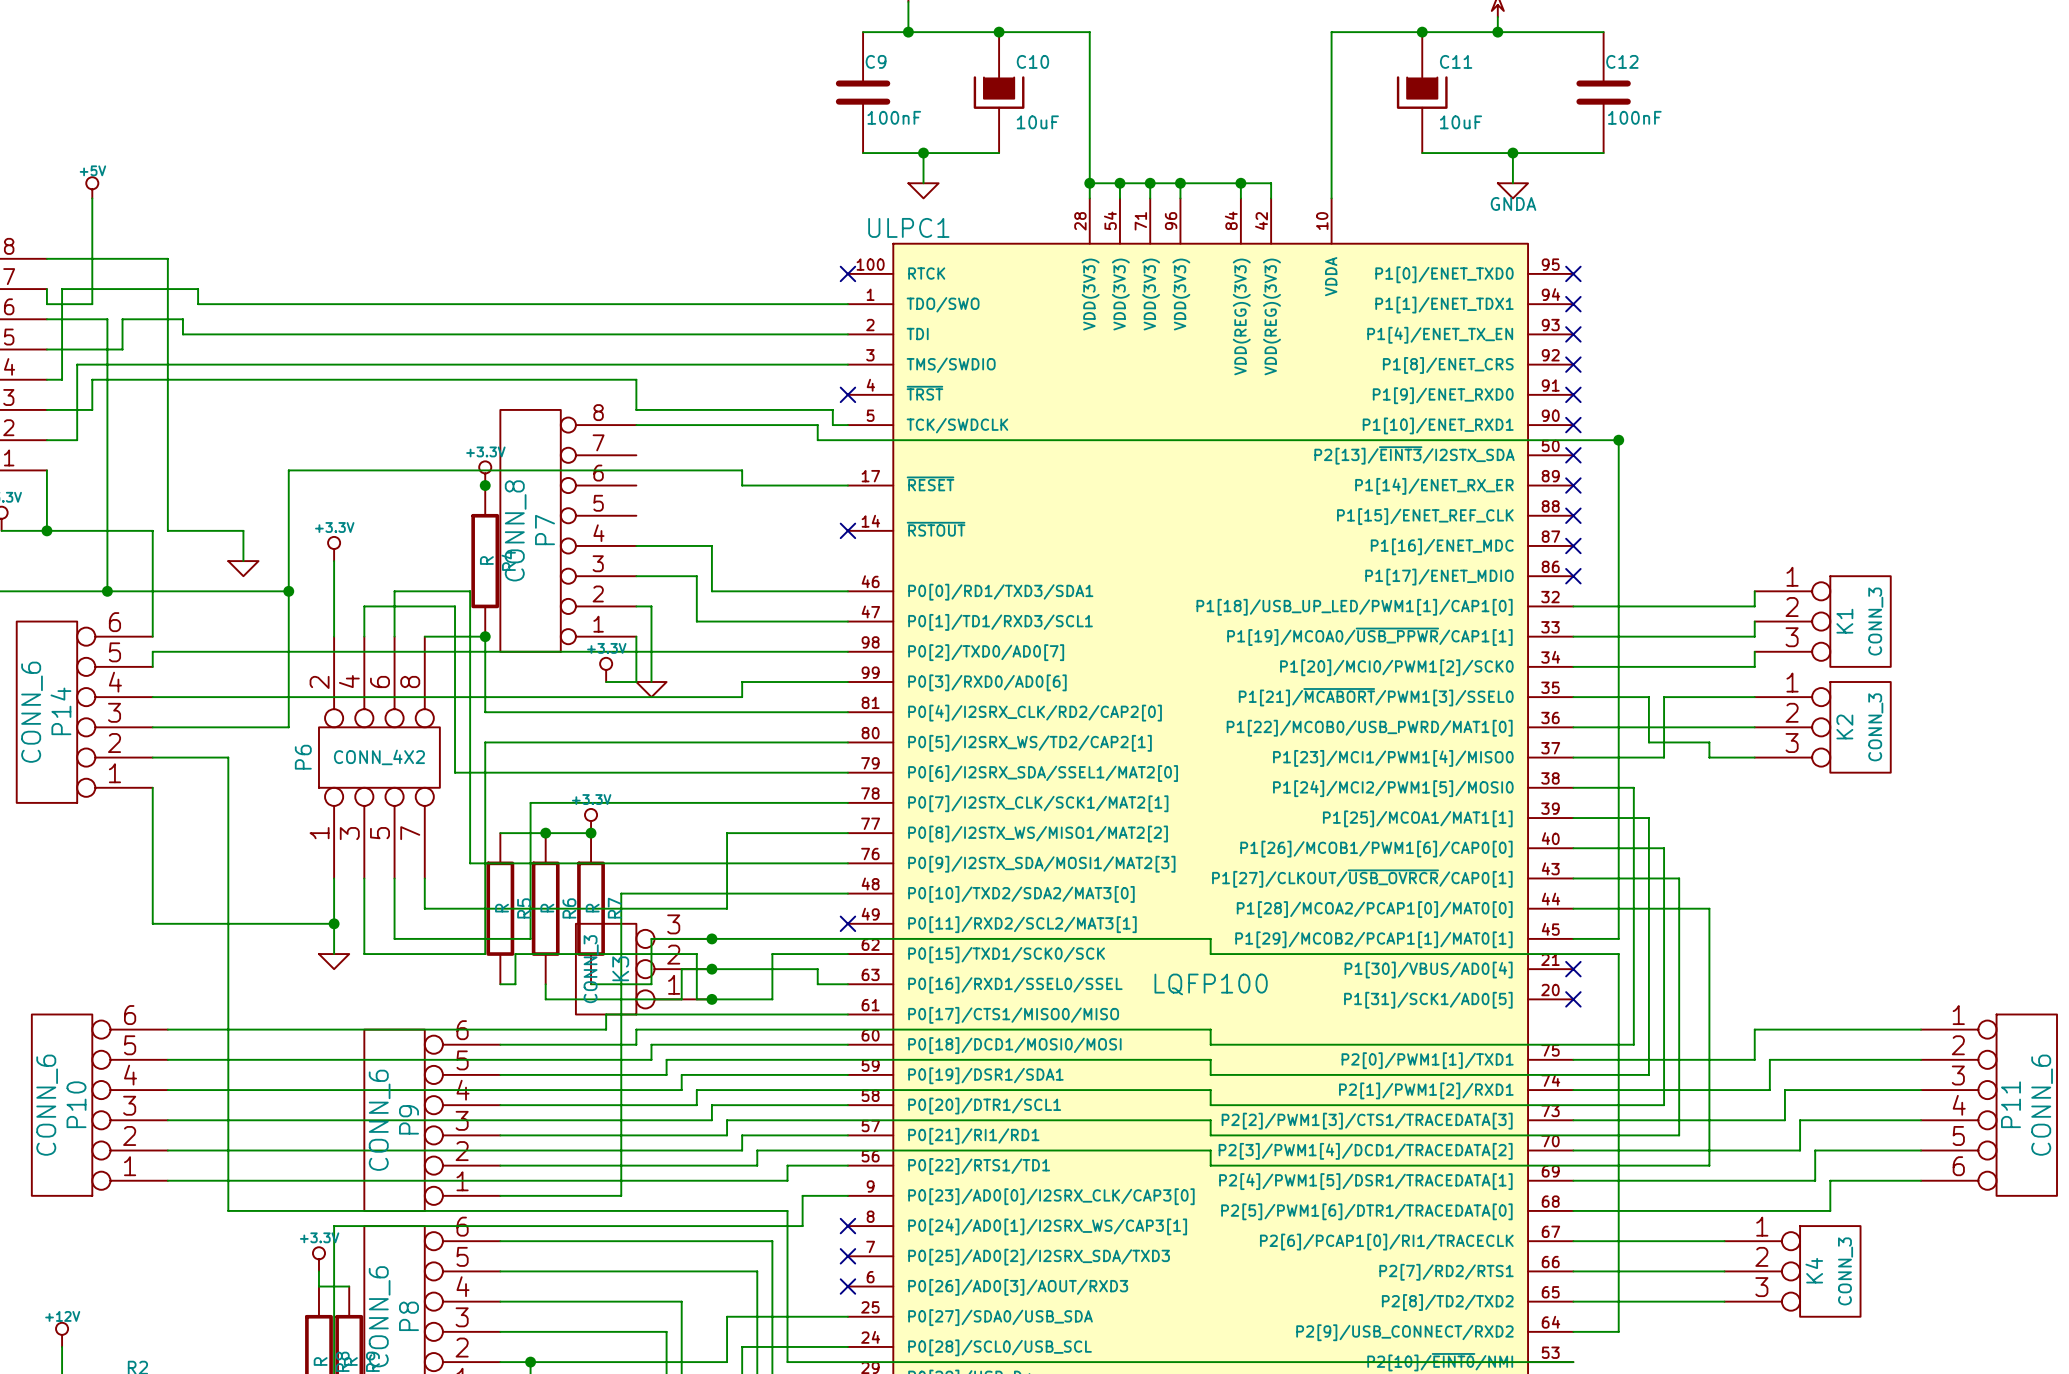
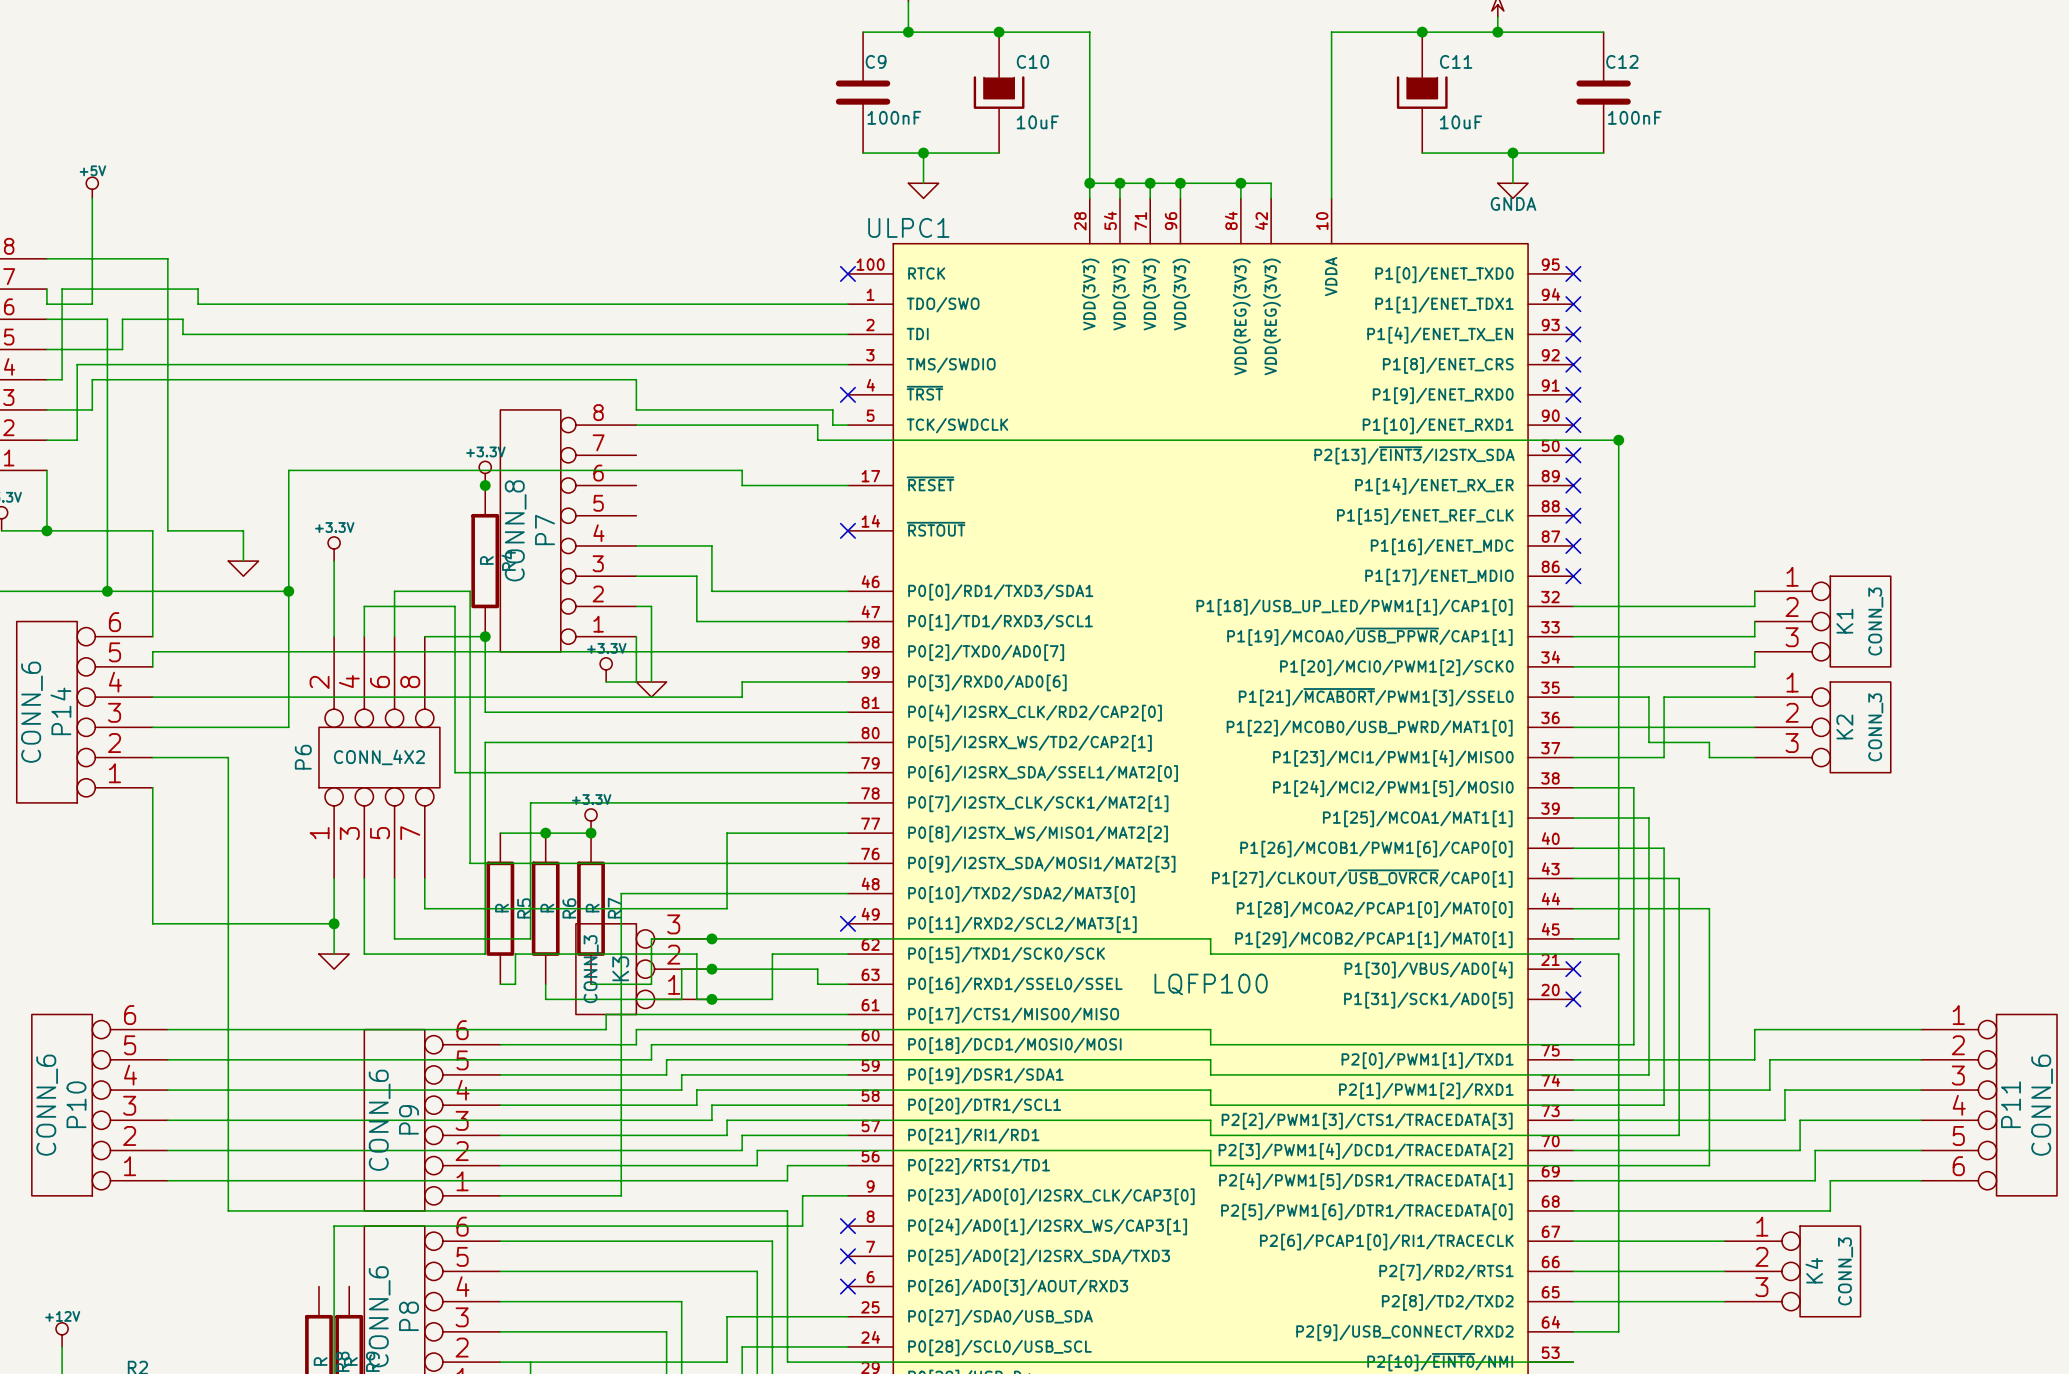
power symbol: +3.3V (318, 1259) -> none
wire: (318, 1271) (318, 1286) (349, 1286) -> none
junction: (530, 1362) -> none

